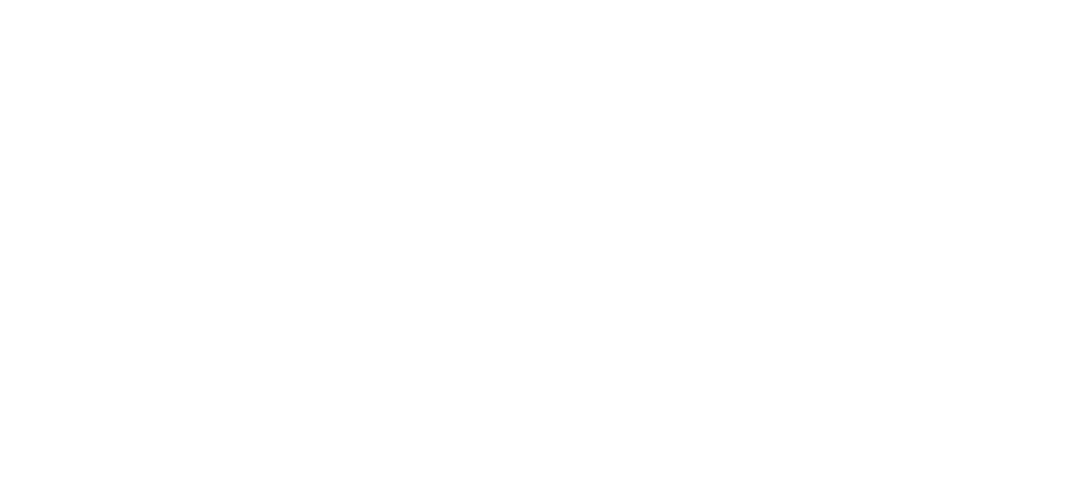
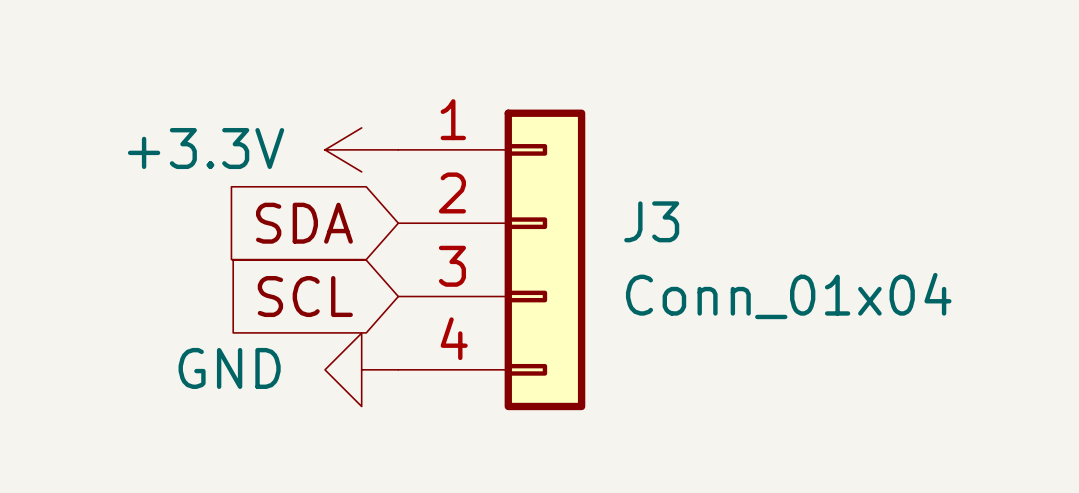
power symbol: none -> +3.3V (361, 149)
global label: none -> SDA (304, 223)
J3: none -> Conn_01x04 (491, 259)
global label: none -> SCL (305, 296)
power symbol: none -> GND (361, 369)

